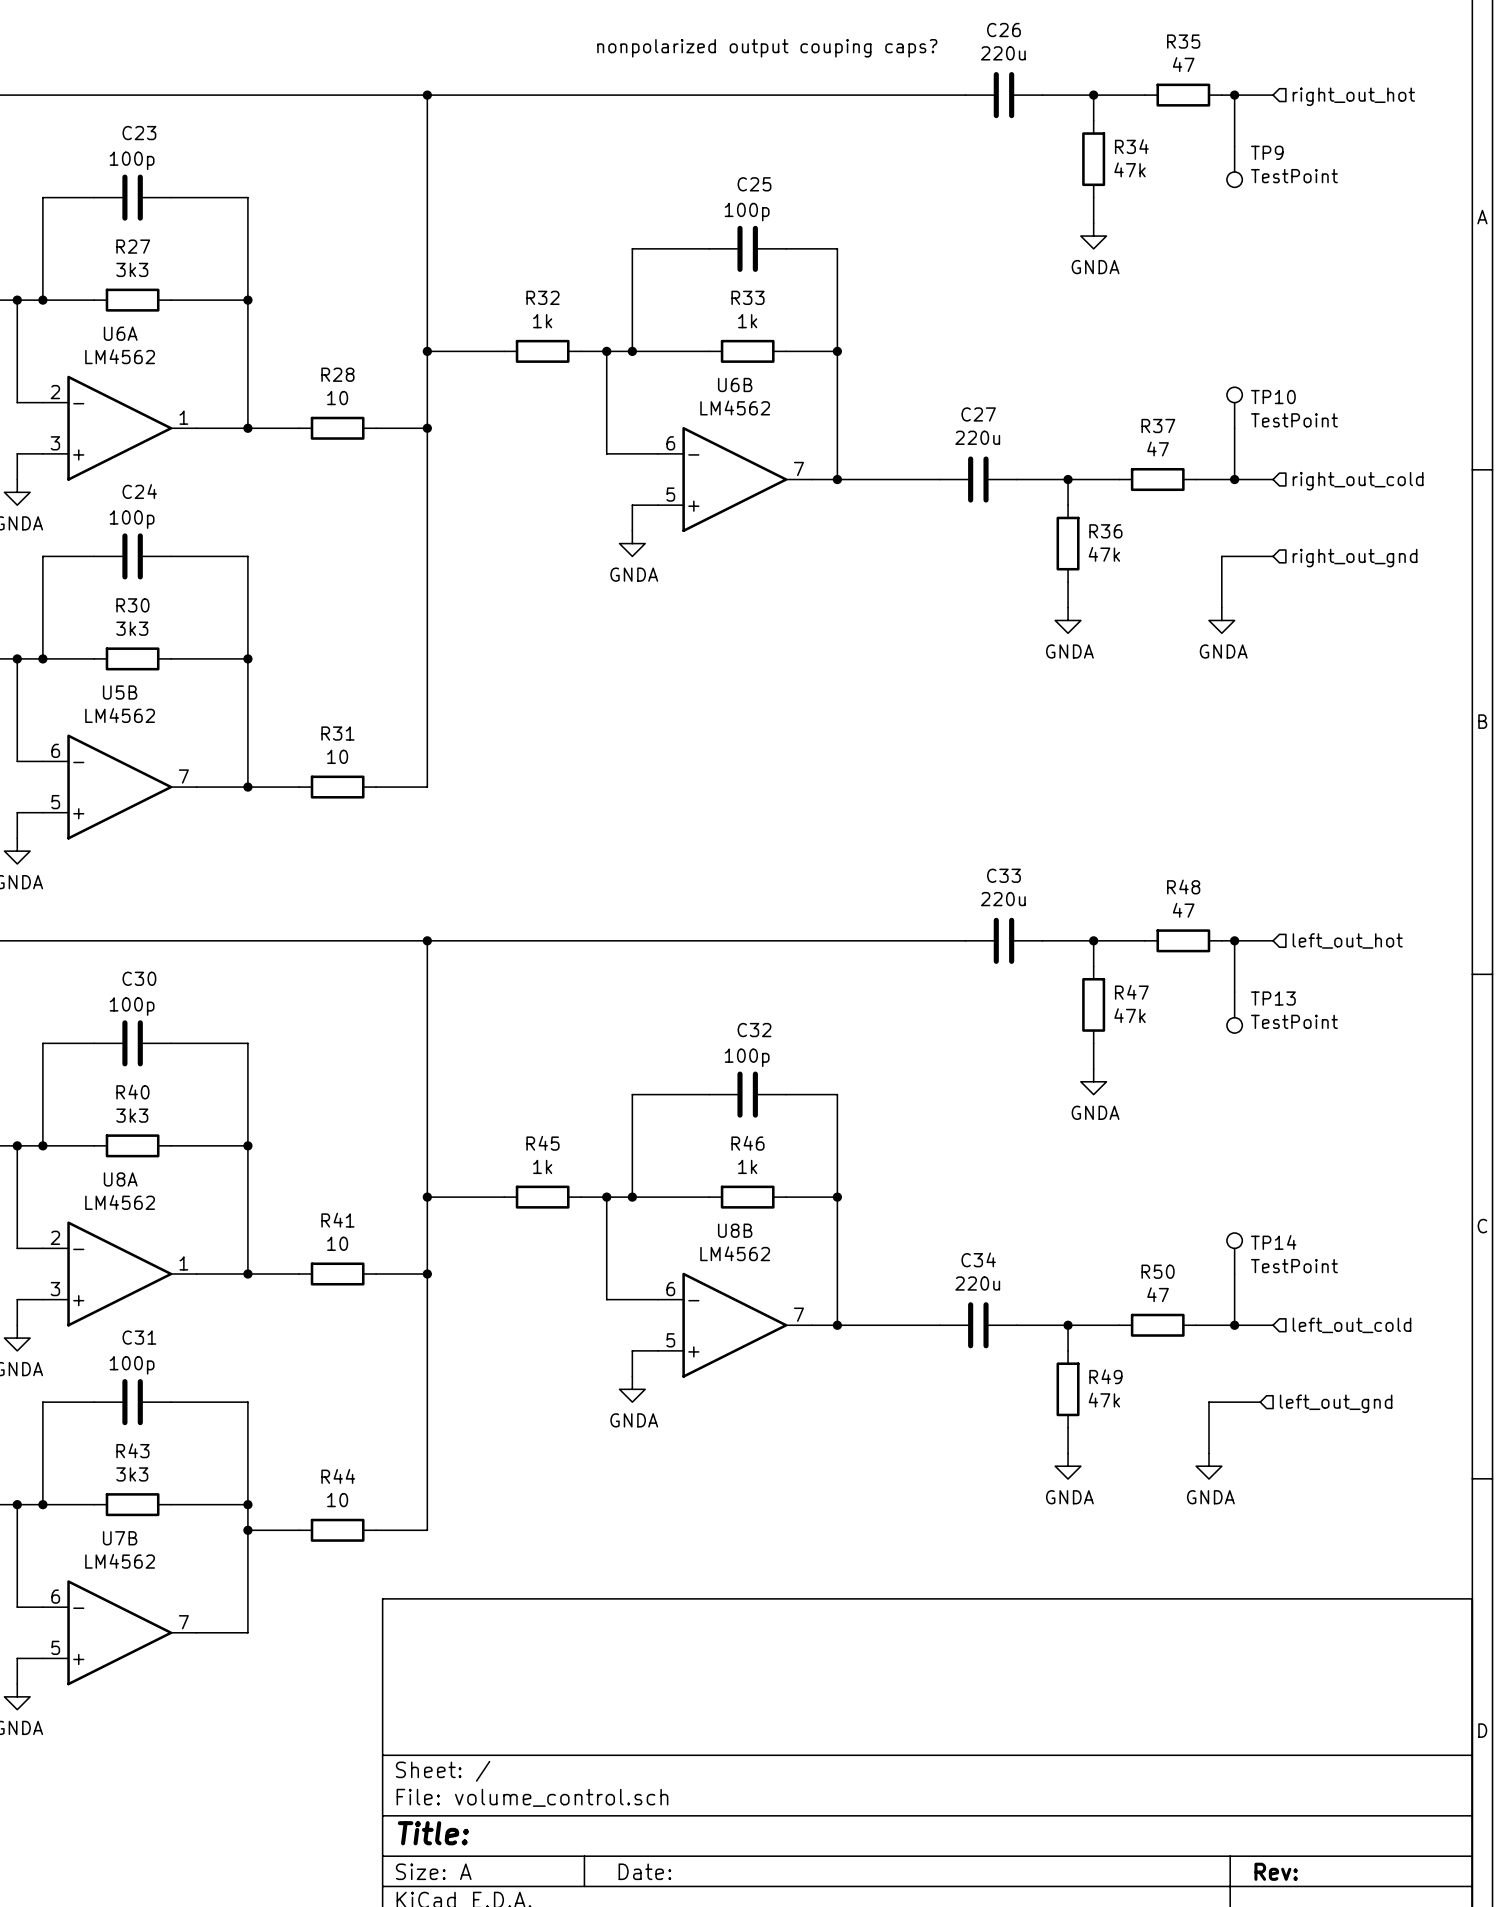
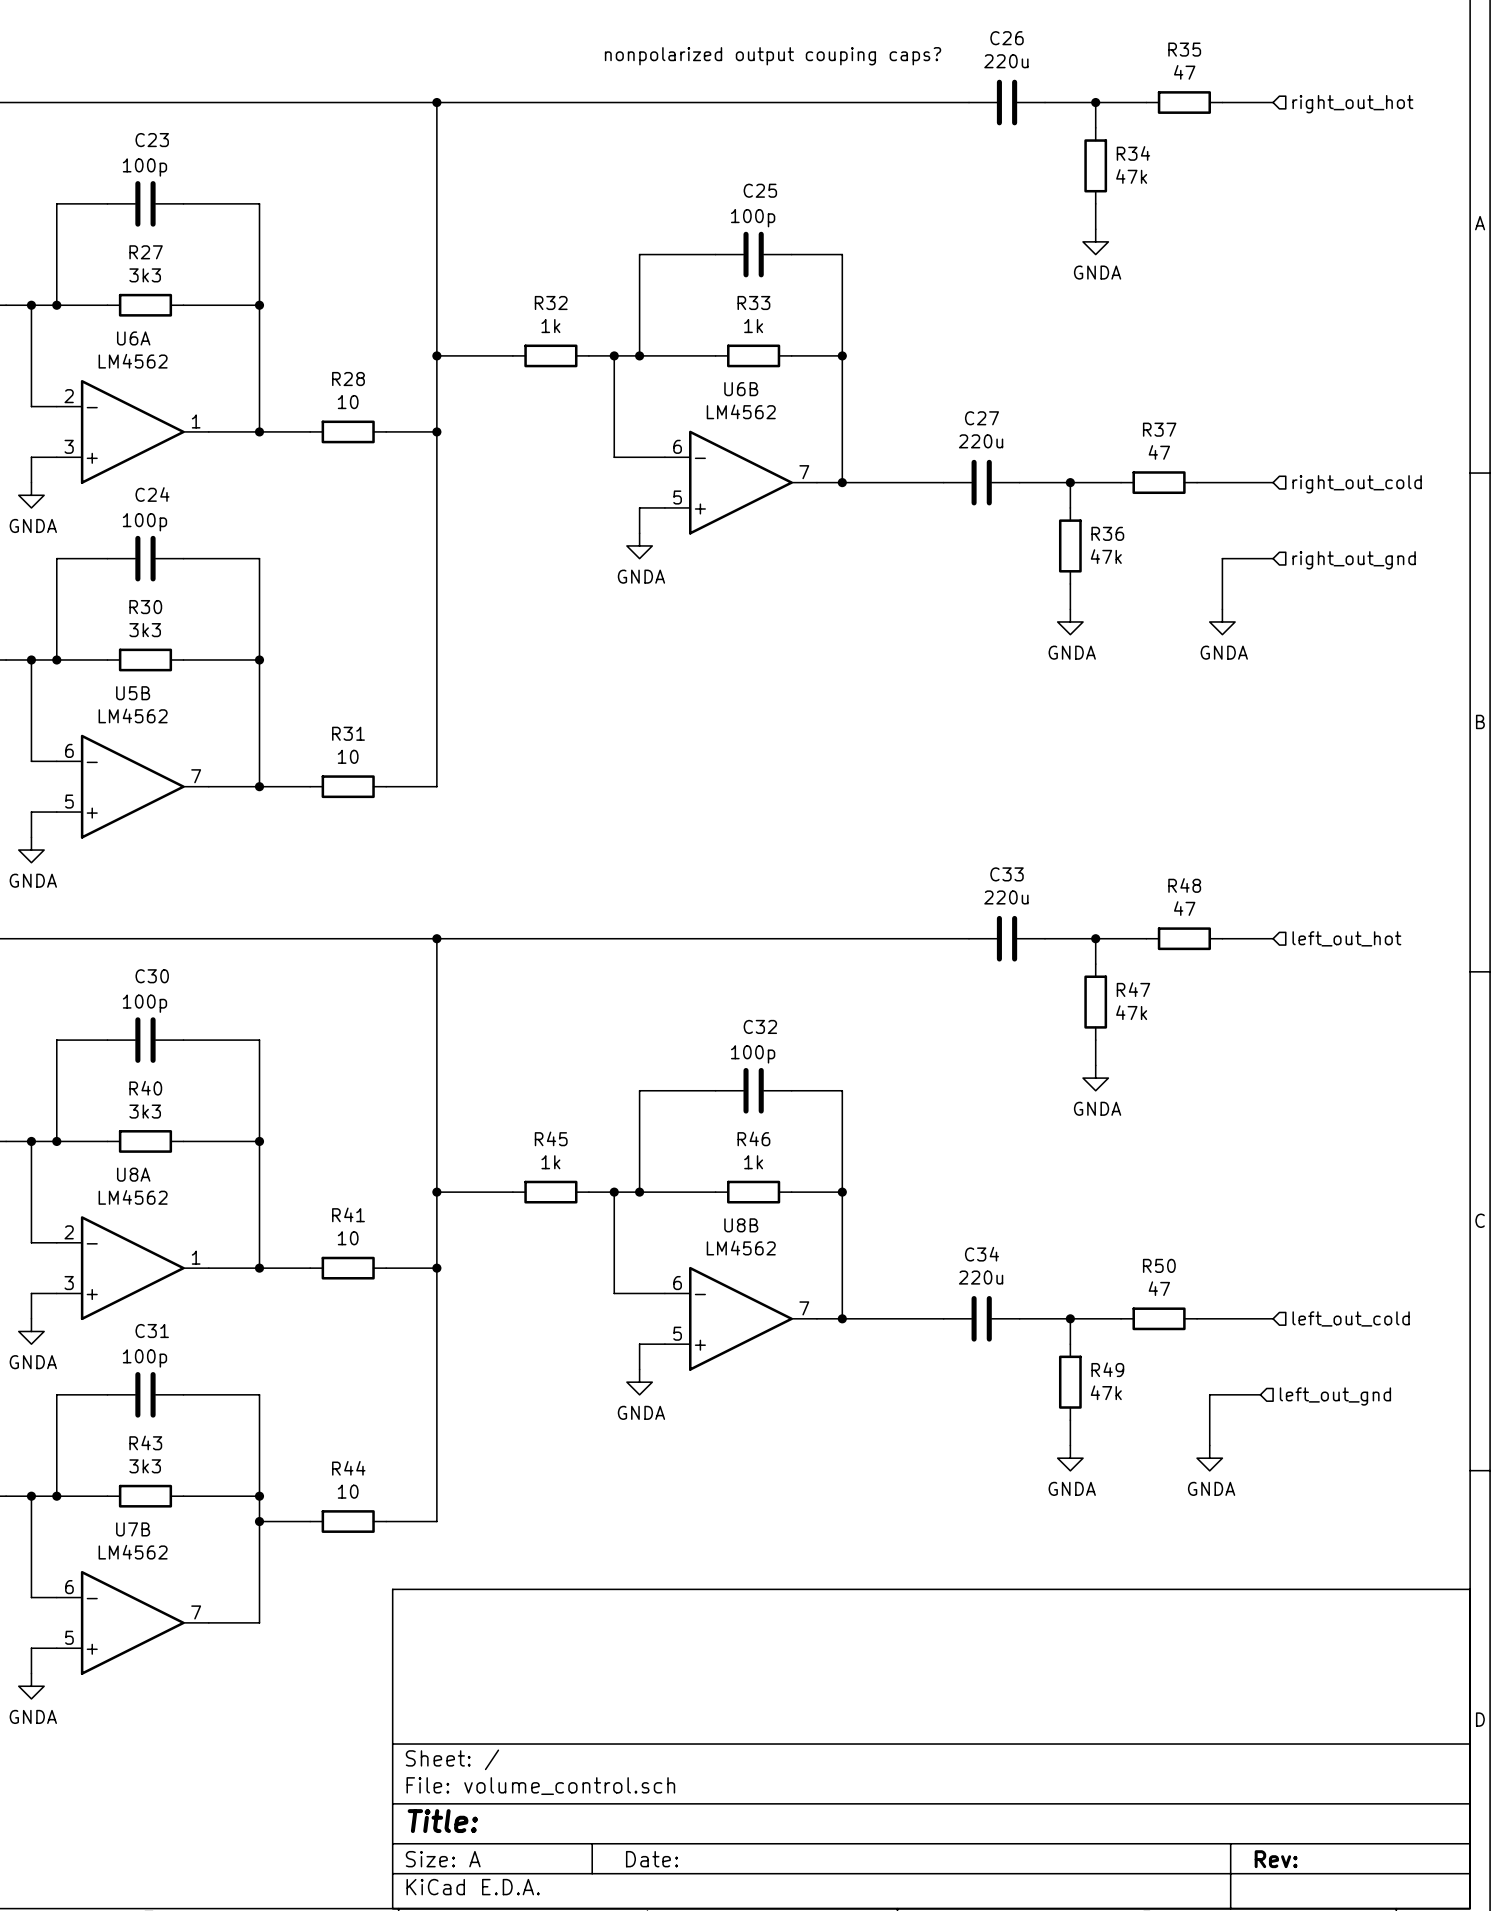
wire: (1234, 95) (1234, 146) -> none
junction: (1234, 95) -> none
TP9: TestPoint (1234, 166) -> none
TP10: TestPoint (1234, 407) -> none
wire: (1234, 428) (1234, 479) -> none
junction: (1234, 479) -> none
wire: (1234, 940) (1234, 992) -> none
junction: (1234, 940) -> none
TP13: TestPoint (1234, 1012) -> none
TP14: TestPoint (1234, 1253) -> none
wire: (1234, 1274) (1234, 1325) -> none
junction: (1234, 1325) -> none

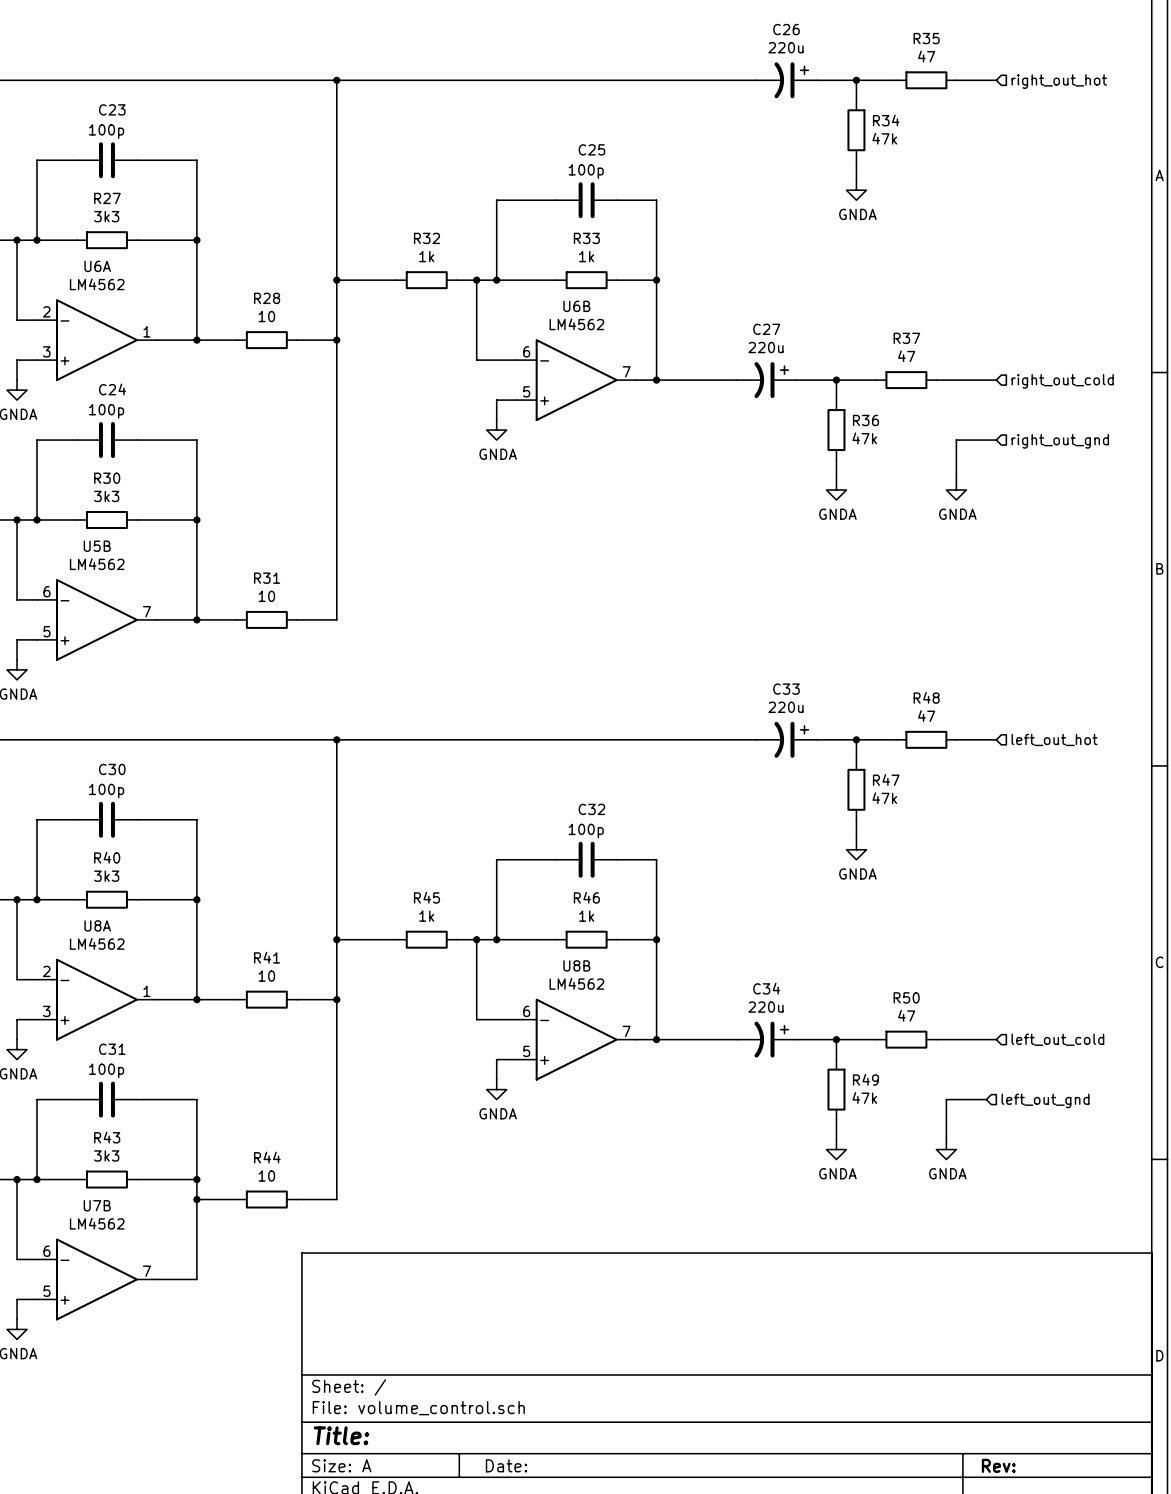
text: nonpolarized output couping caps? (773, 56) -> none
C26 symbol: [969, 79, 1046, 126] -> [756, 62, 817, 99]
C27 symbol: [943, 459, 1020, 506] -> [736, 362, 797, 399]
C33 symbol: [969, 915, 1046, 962] -> [756, 721, 817, 758]
C34 symbol: [943, 1296, 1020, 1342] -> [736, 1021, 797, 1058]

